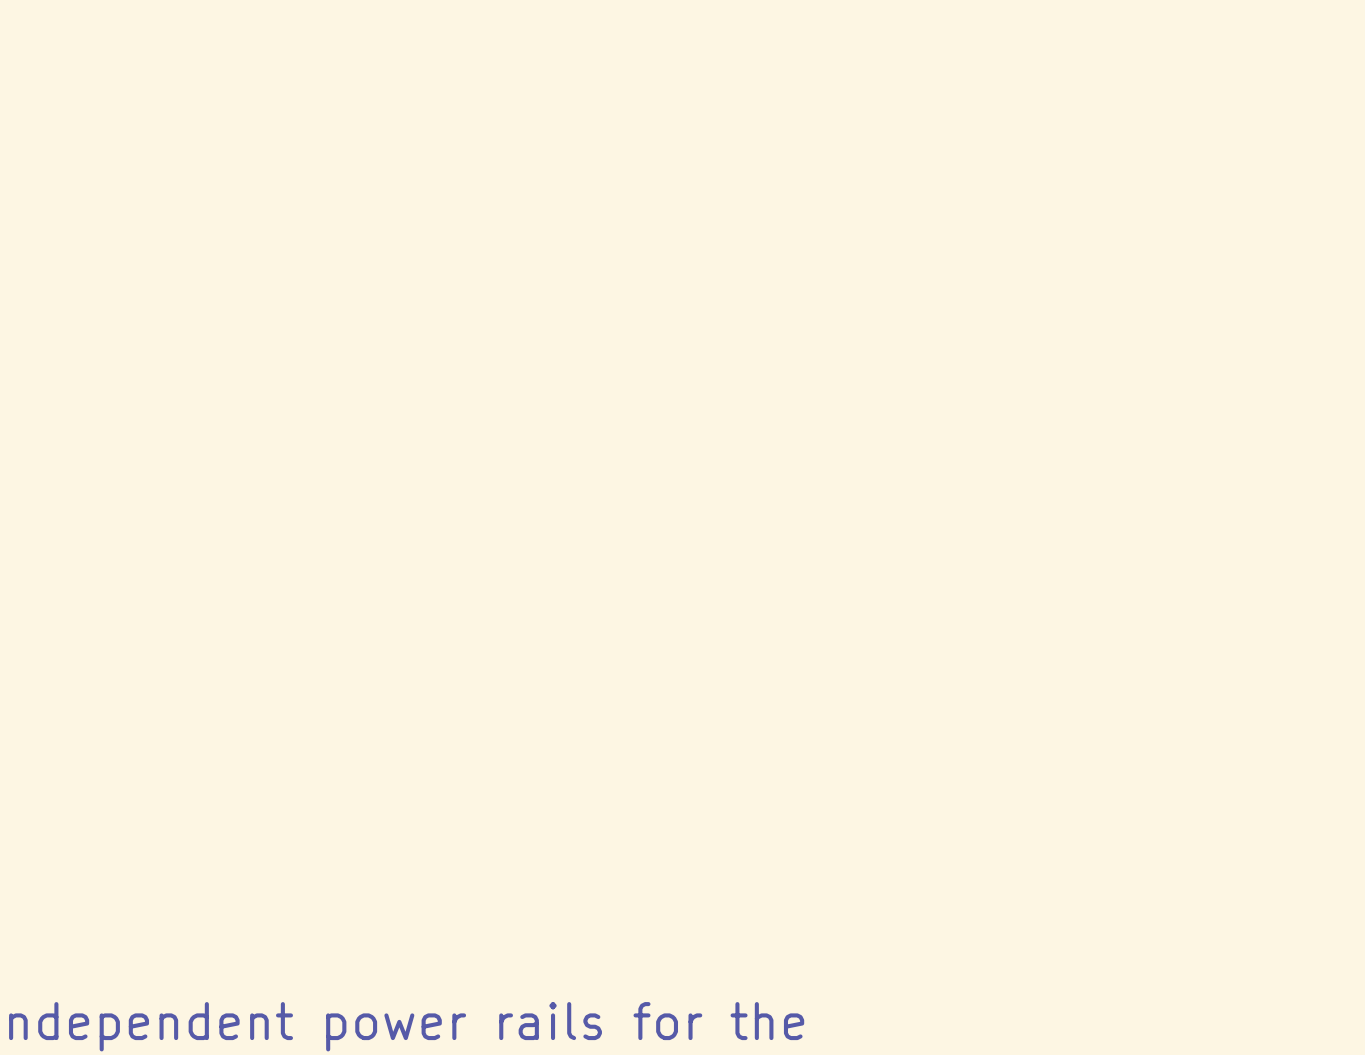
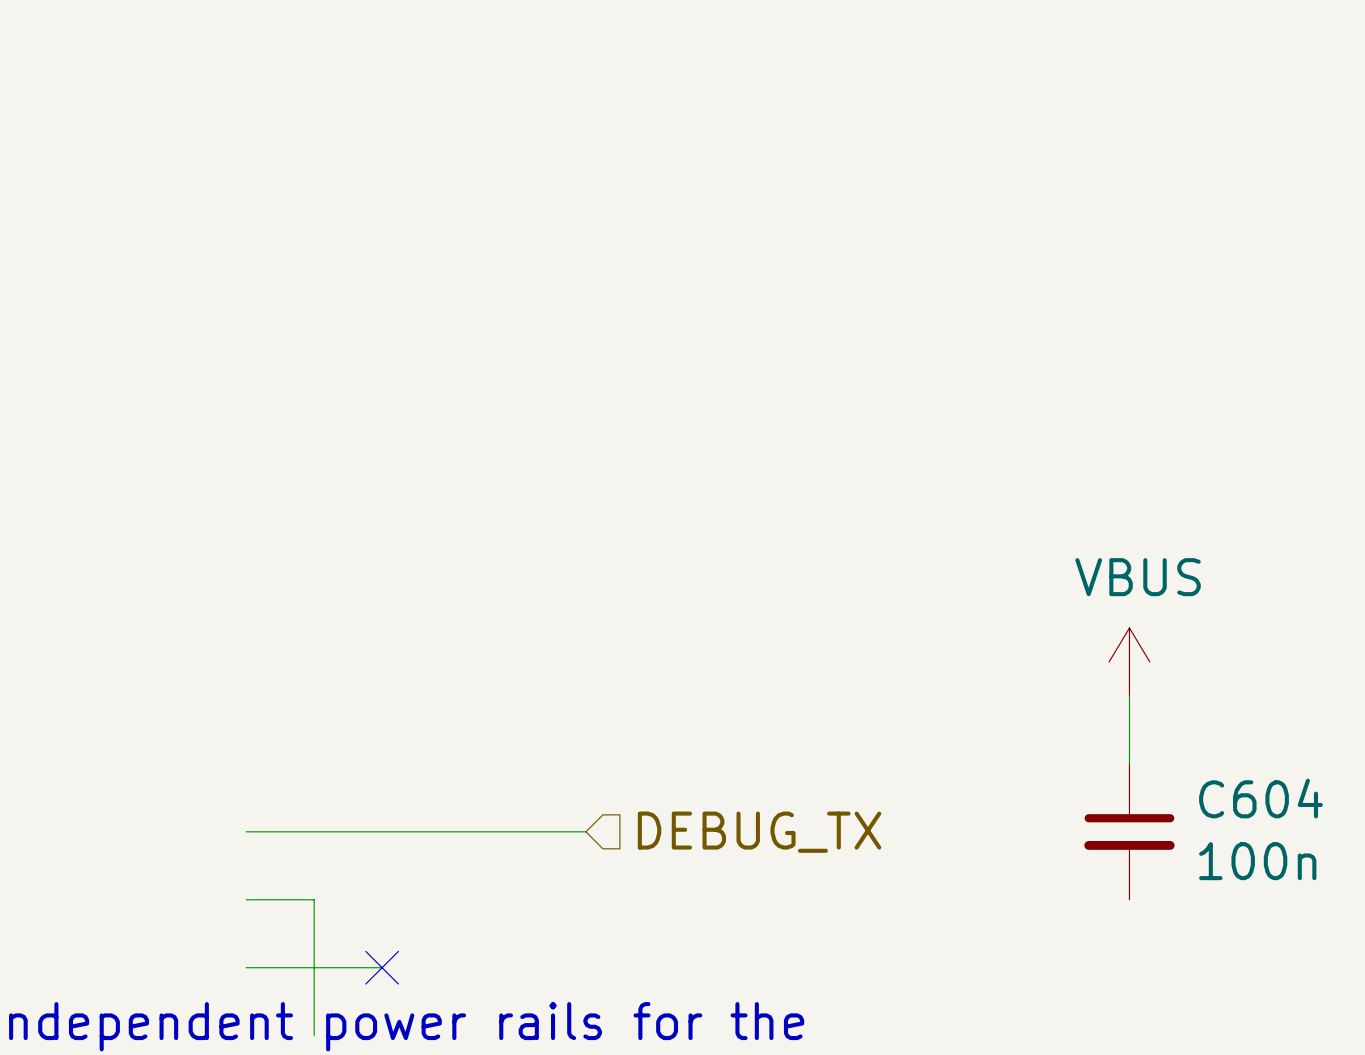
power symbol: none -> VBUS (1129, 661)
wire: none -> (1129, 695) (1129, 763)
wire: none -> (246, 831) (585, 831)
C604: none -> 100n (1129, 831)
hierarchical label: none -> DEBUG_TX (759, 832)
wire: none -> (246, 899) (314, 899) (314, 1035)
wire: none -> (246, 967) (382, 967)
no-connect mark: none -> (382, 967)

